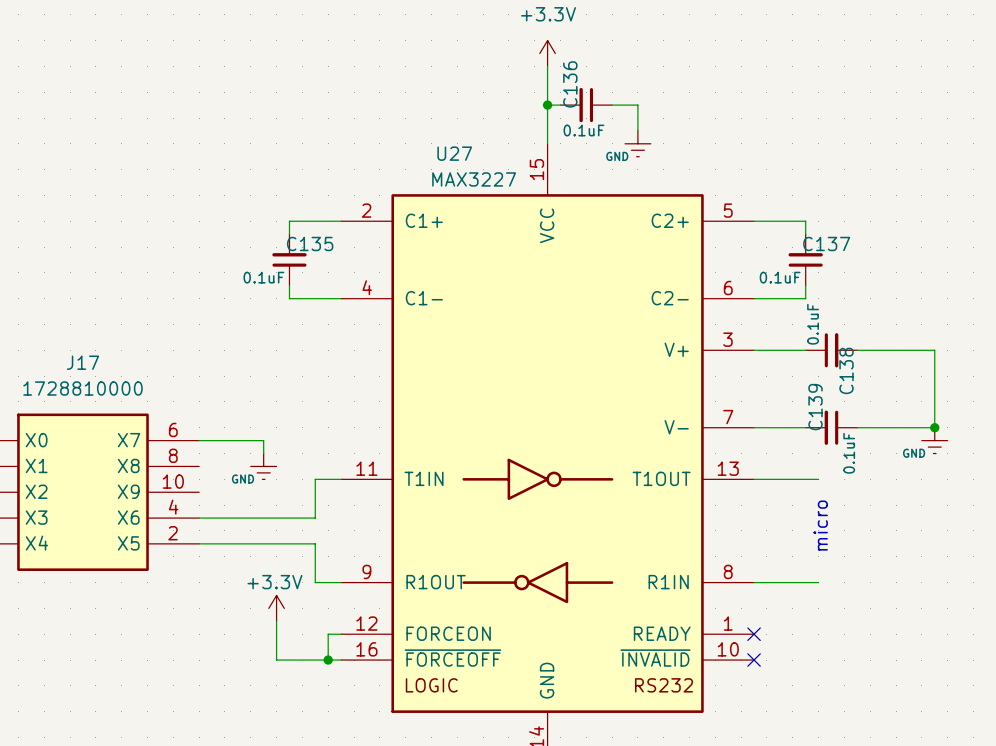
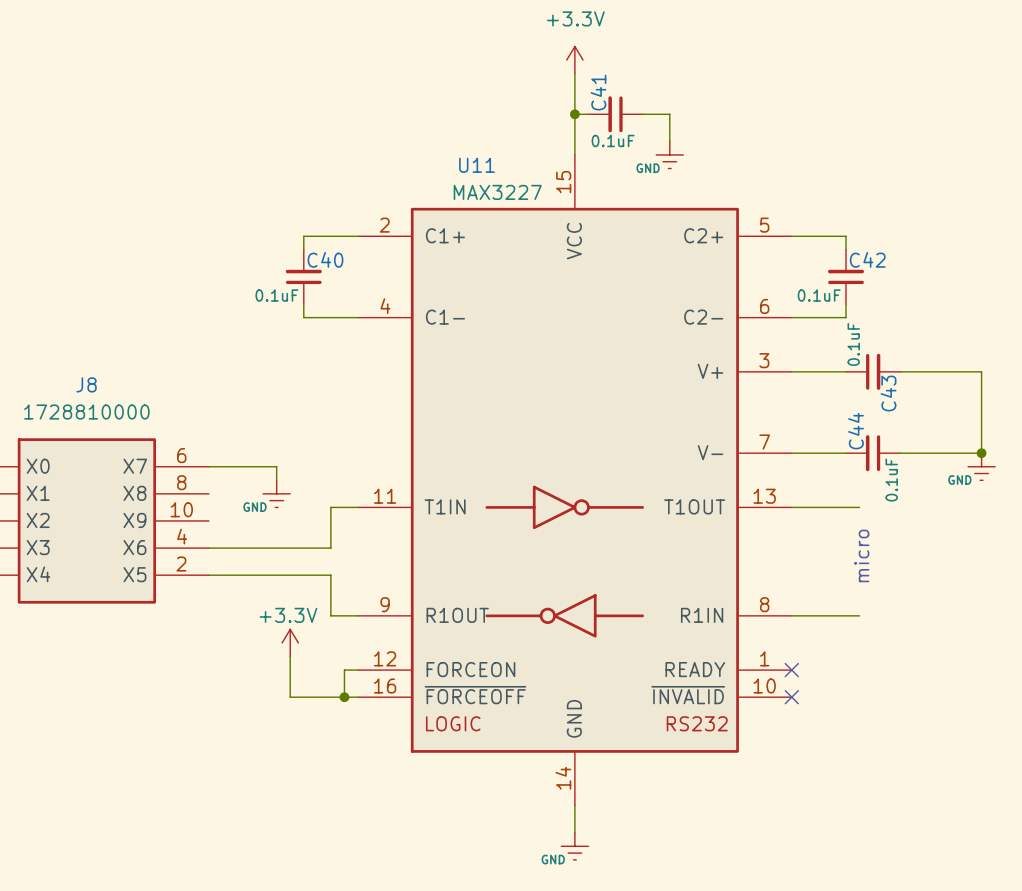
C136 name: C136 (570, 84) -> C41 (598, 92)
U27 name: U27 (454, 153) -> U11 (477, 165)
C135 name: C135 (310, 243) -> C40 (325, 259)
C137 name: C137 (826, 243) -> C42 (867, 259)
J17 name: J17 (82, 362) -> J8 (86, 384)
C138 name: C138 (846, 370) -> C43 (888, 393)
C139 name: C139 (815, 407) -> C44 (856, 431)

